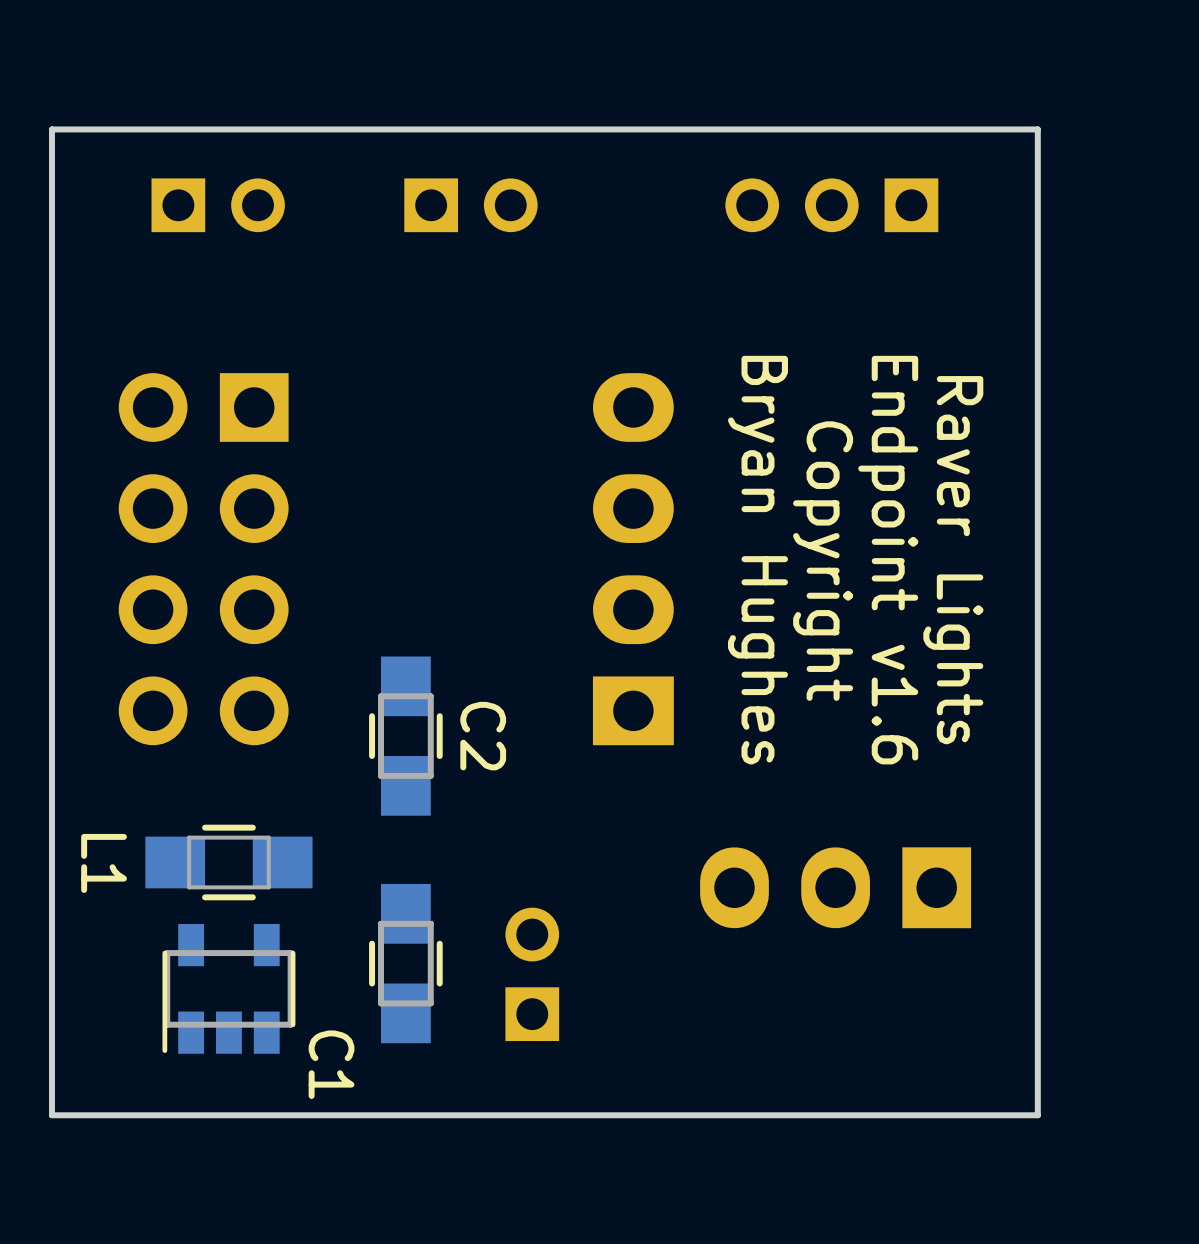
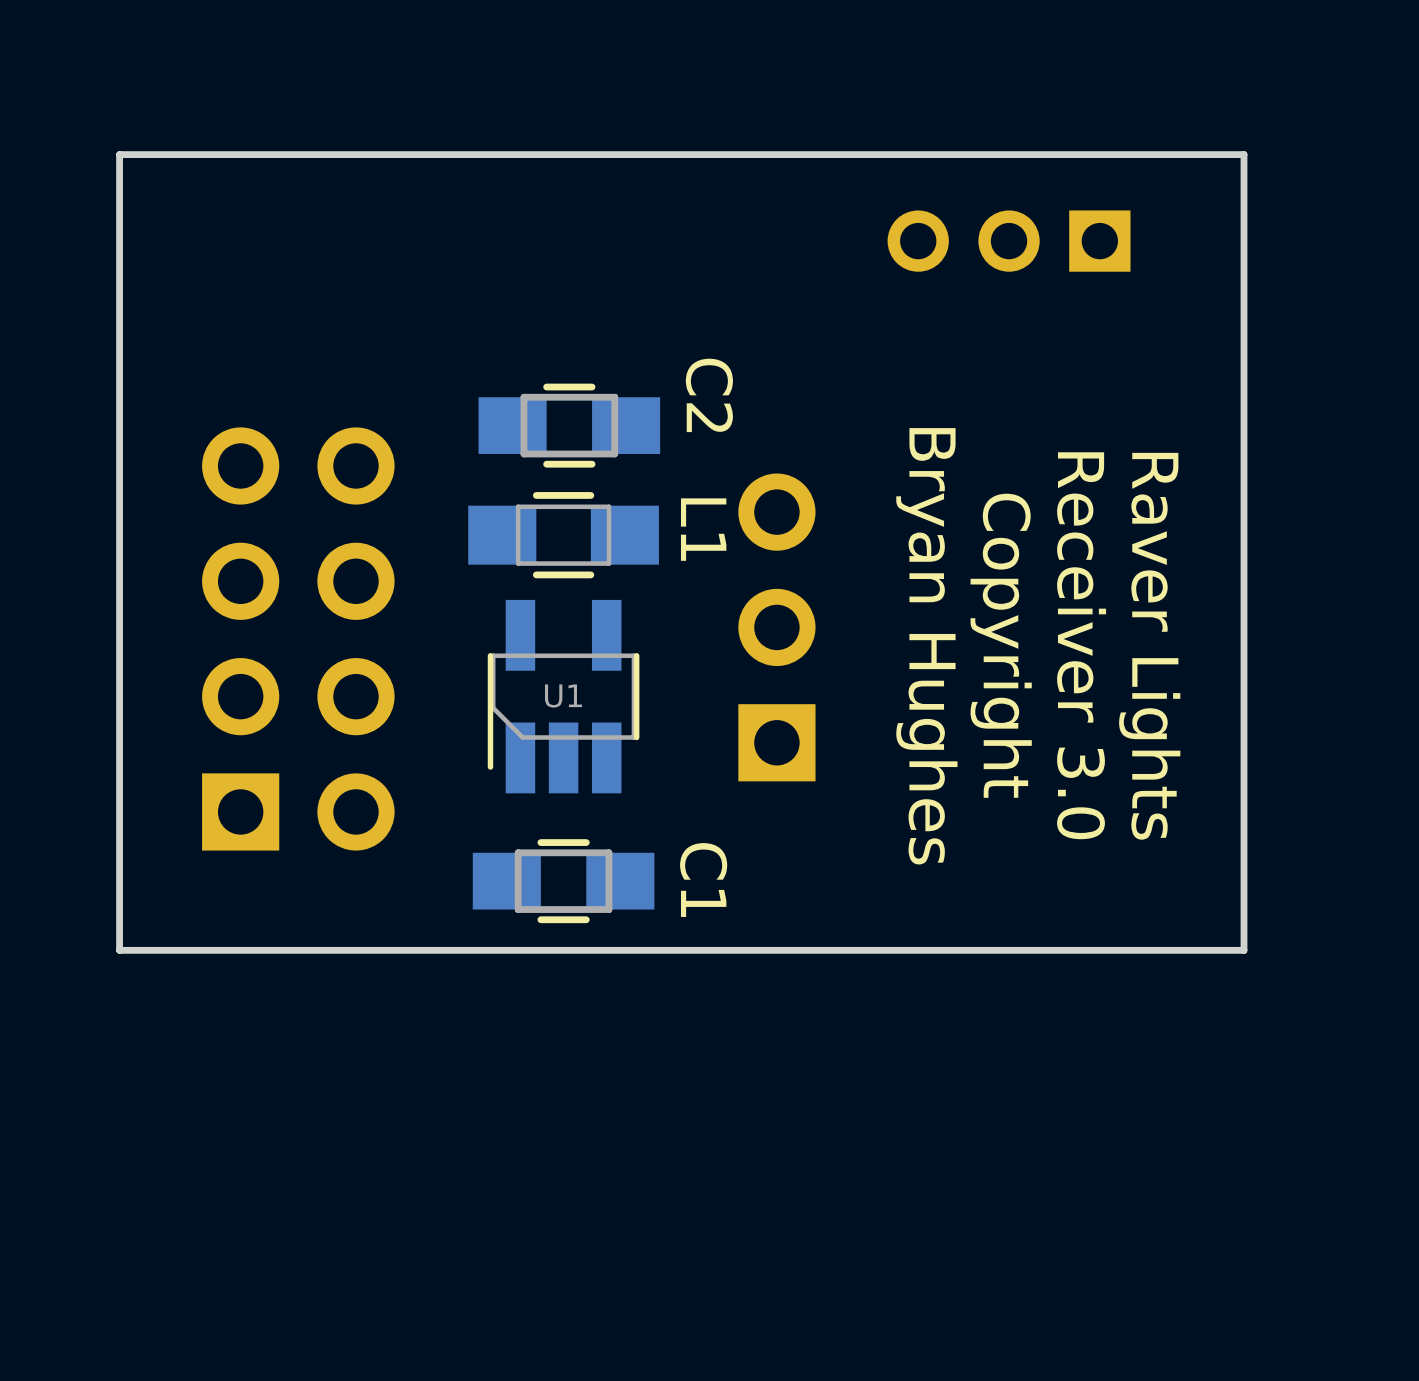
part: (218, 205) -> none
part: (470, 205) -> none
part footprint: [118, 373, 289, 746] -> [202, 427, 395, 851]
part footprint: [592, 373, 674, 746] -> [738, 473, 816, 782]
text: Endpoint v1.6 (888, 560) -> Receiver 3.0 (1081, 645)
U1: none -> (563, 696)
C2 rotation: 0° (405, 736) -> 90° clockwise (569, 425)
C2 position: (405, 736) -> (569, 425)
board edge: (1037, 827) (1037, 1115) (51, 1115) (51, 827) -> (1244, 950) (119, 950)
L1 position: (228, 862) -> (563, 535)
L1 name position: L1 (104, 863) -> L1 (703, 529)
part: (835, 887) -> none
C1 rotation: 0° (405, 963) -> 90° clockwise (563, 881)
C1 position: (405, 963) -> (563, 881)
part: (532, 974) -> none
part: (228, 988) -> none
C1 name position: C1 (331, 1064) -> C1 (703, 880)

